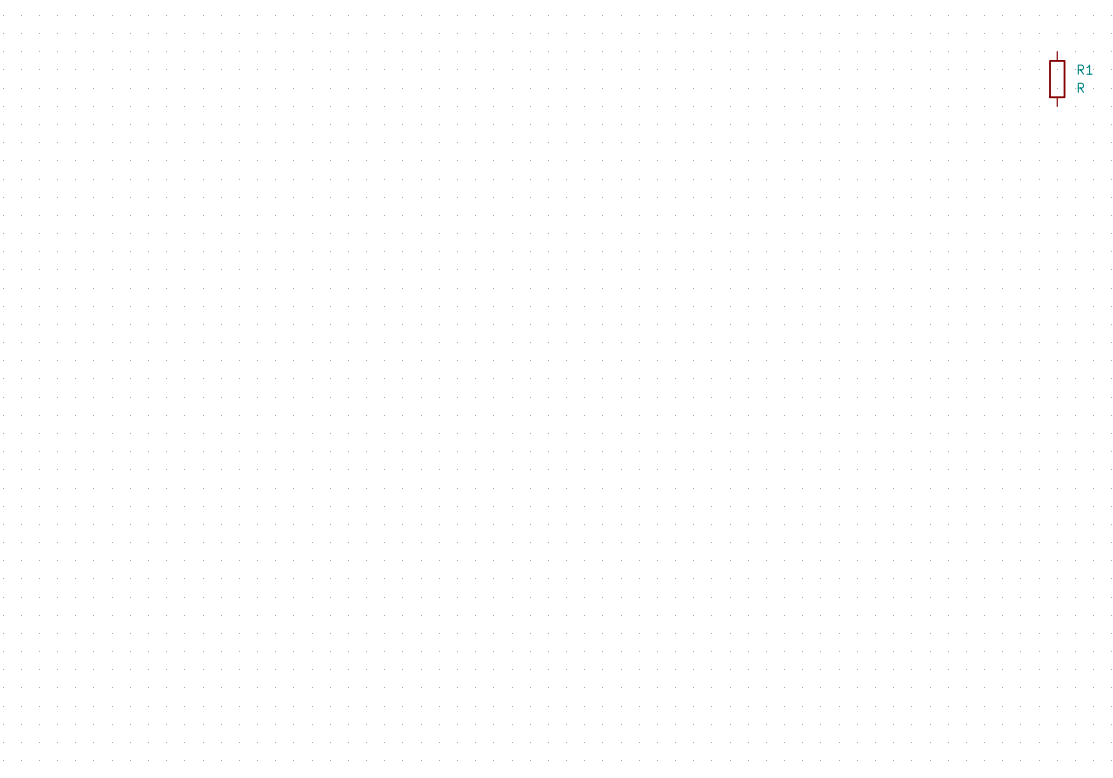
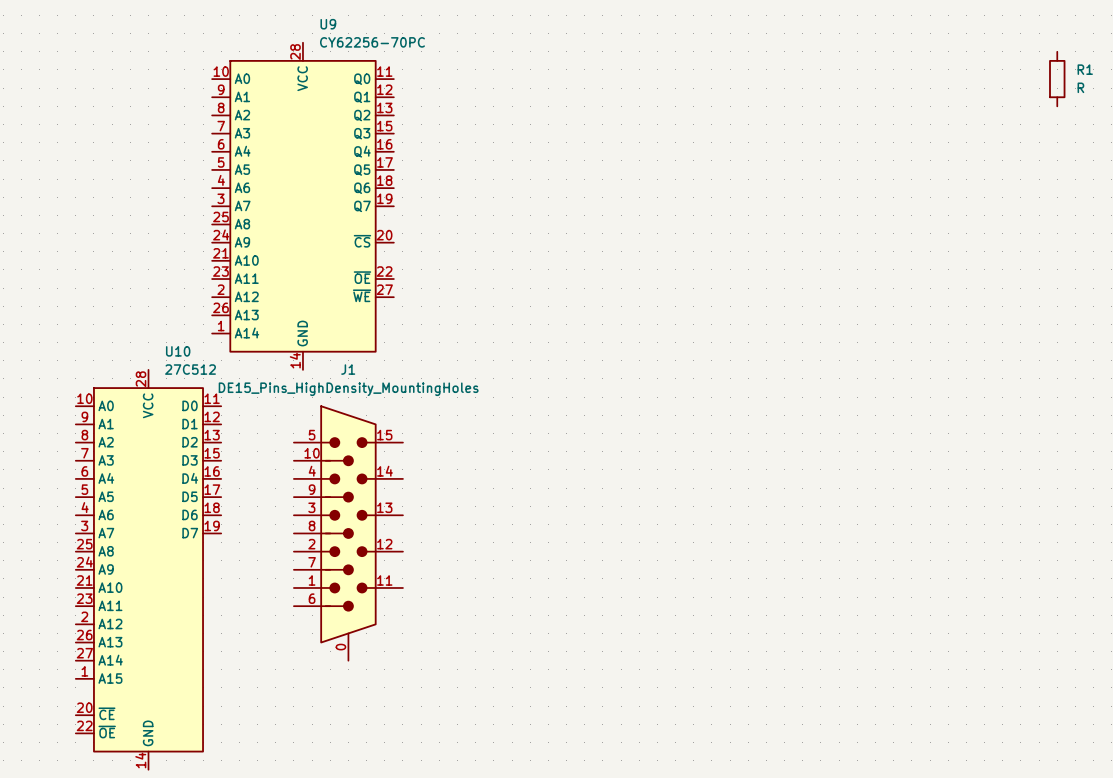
U9: none -> CY62256-70PC (302, 206)
J1: none -> DE15_Pins_HighDensity_MountingHoles (348, 533)
U10: none -> 27C512 (148, 569)

